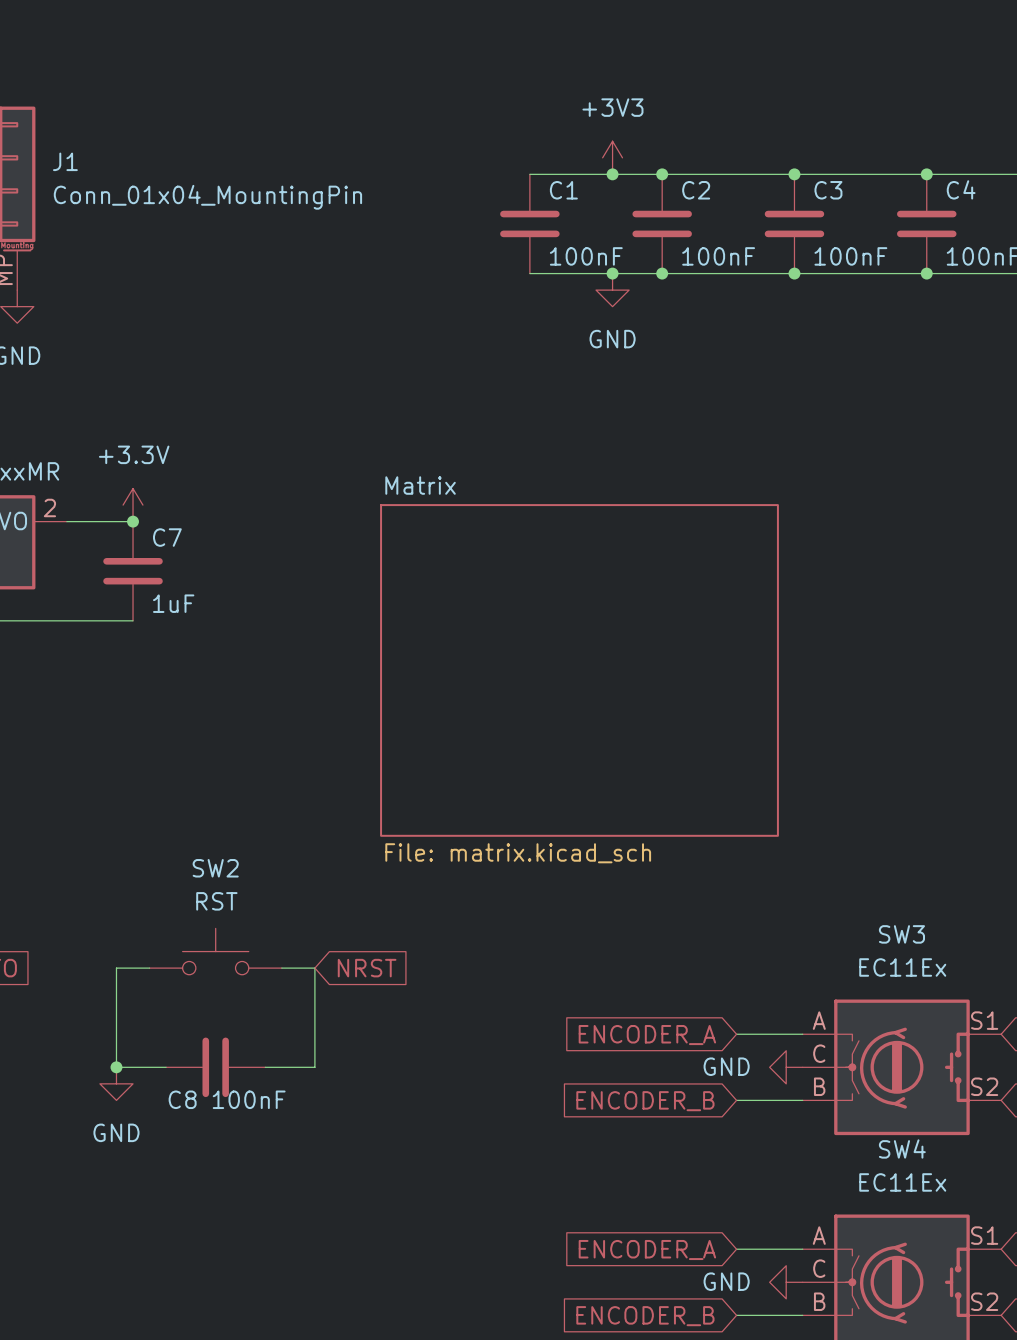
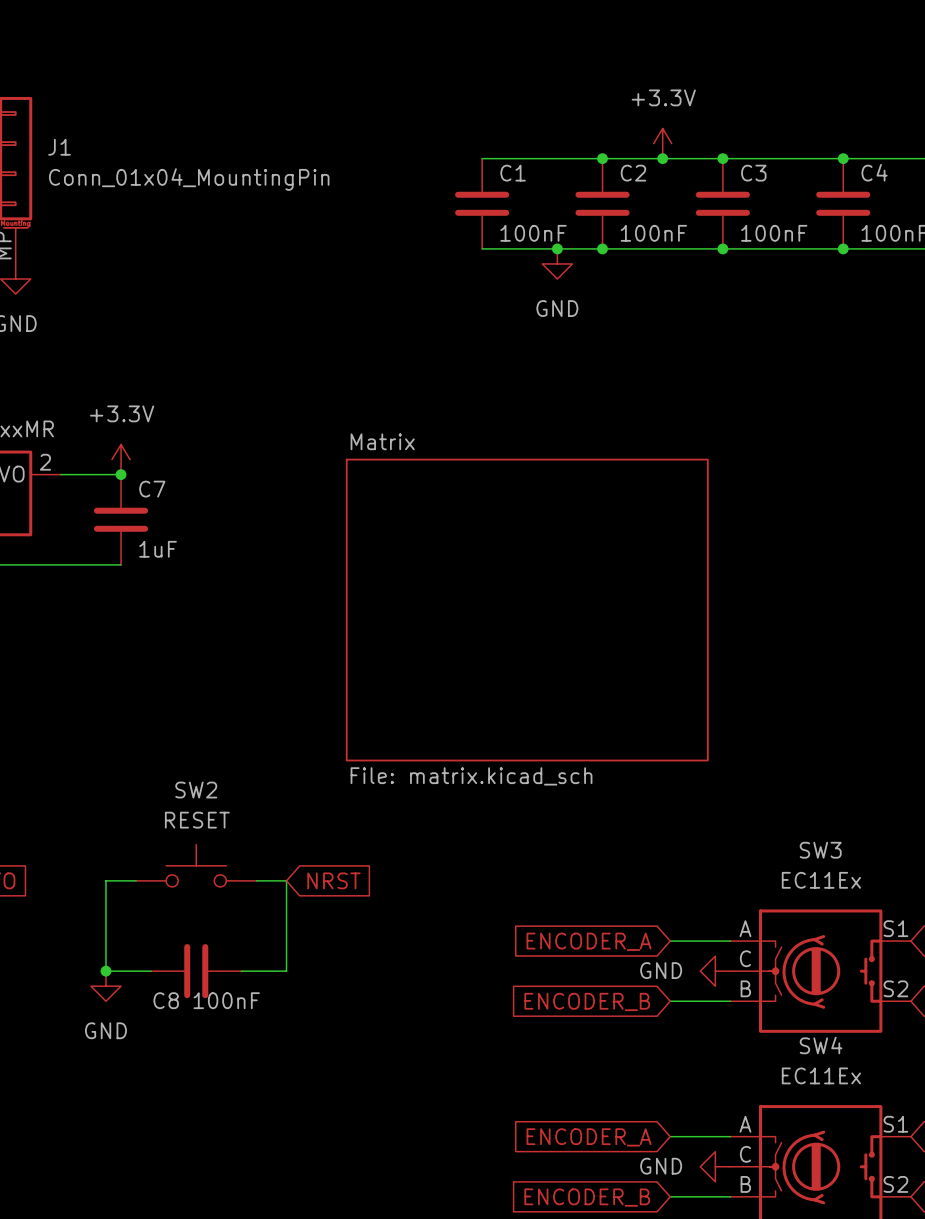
power symbol: +3V3 (612, 157) -> none
power symbol: none -> +3.3V (662, 143)
junction: (612, 174) -> none
junction: none -> (662, 158)
SW2 value: RST (216, 901) -> RESET (197, 820)

